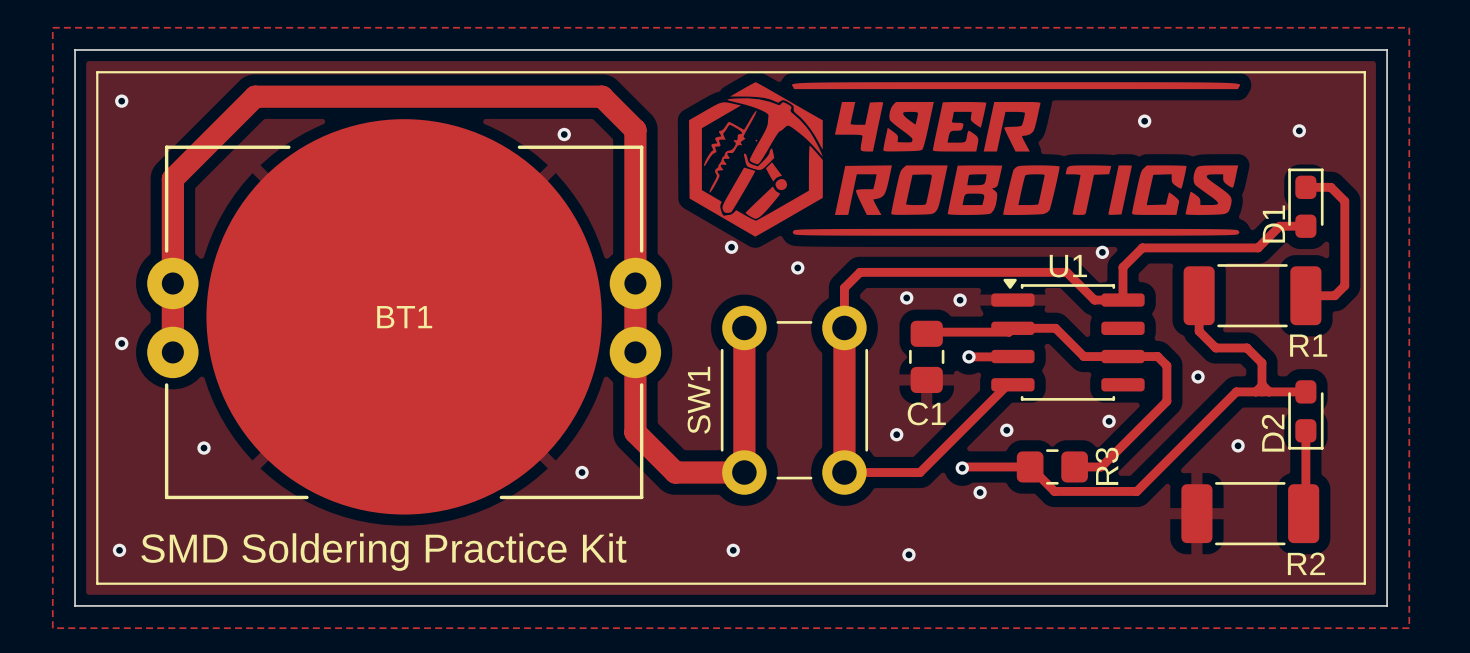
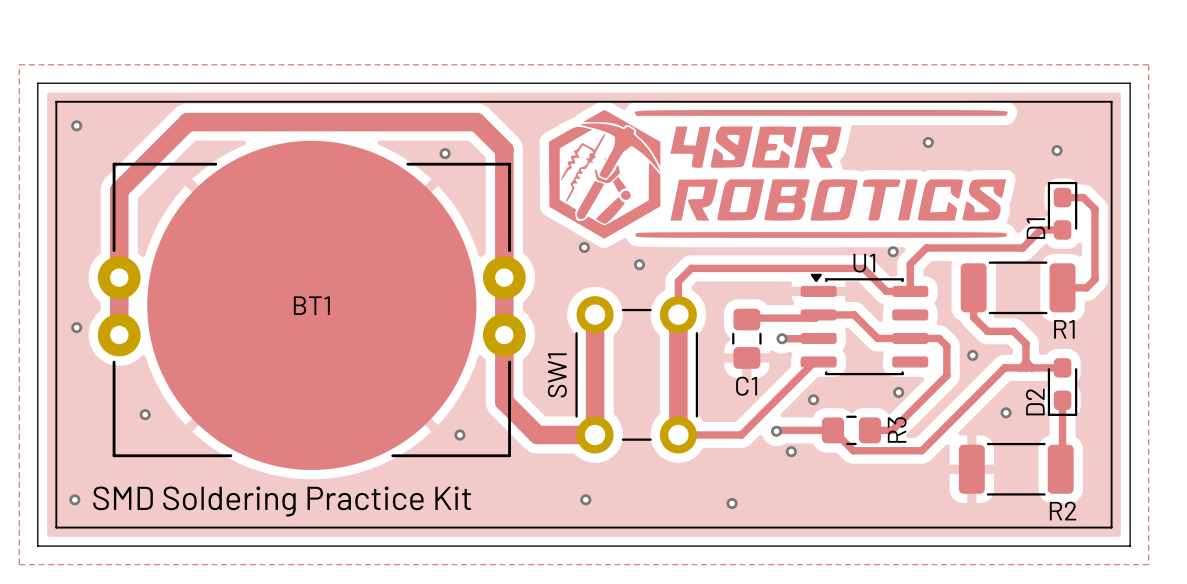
via: (906, 297) -> none
via: (960, 300) -> none
via: (896, 434) -> none

